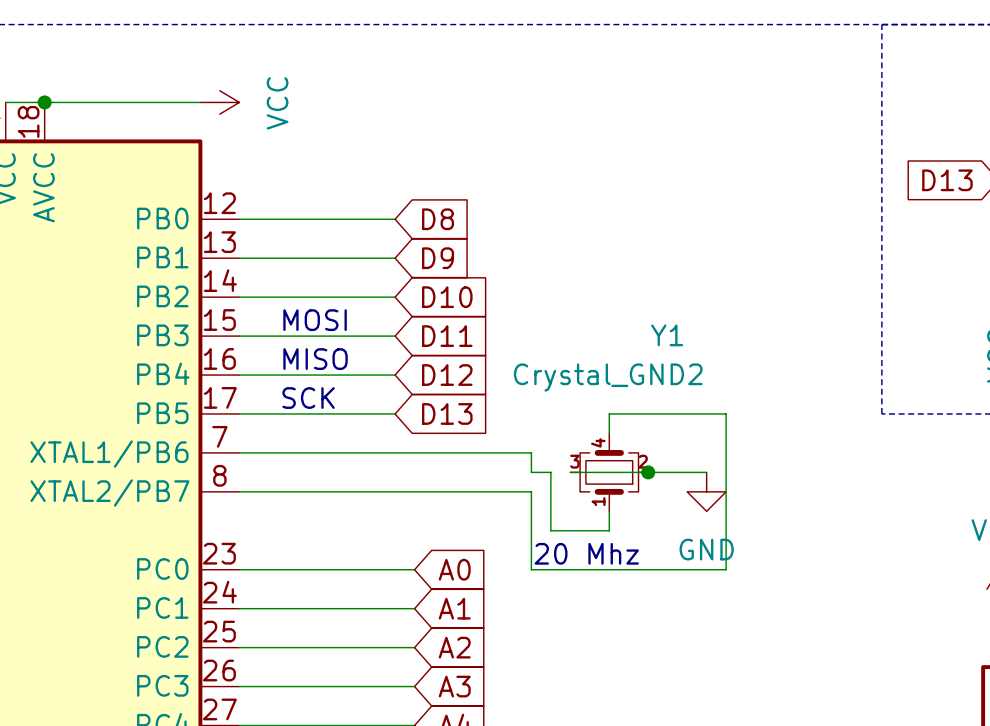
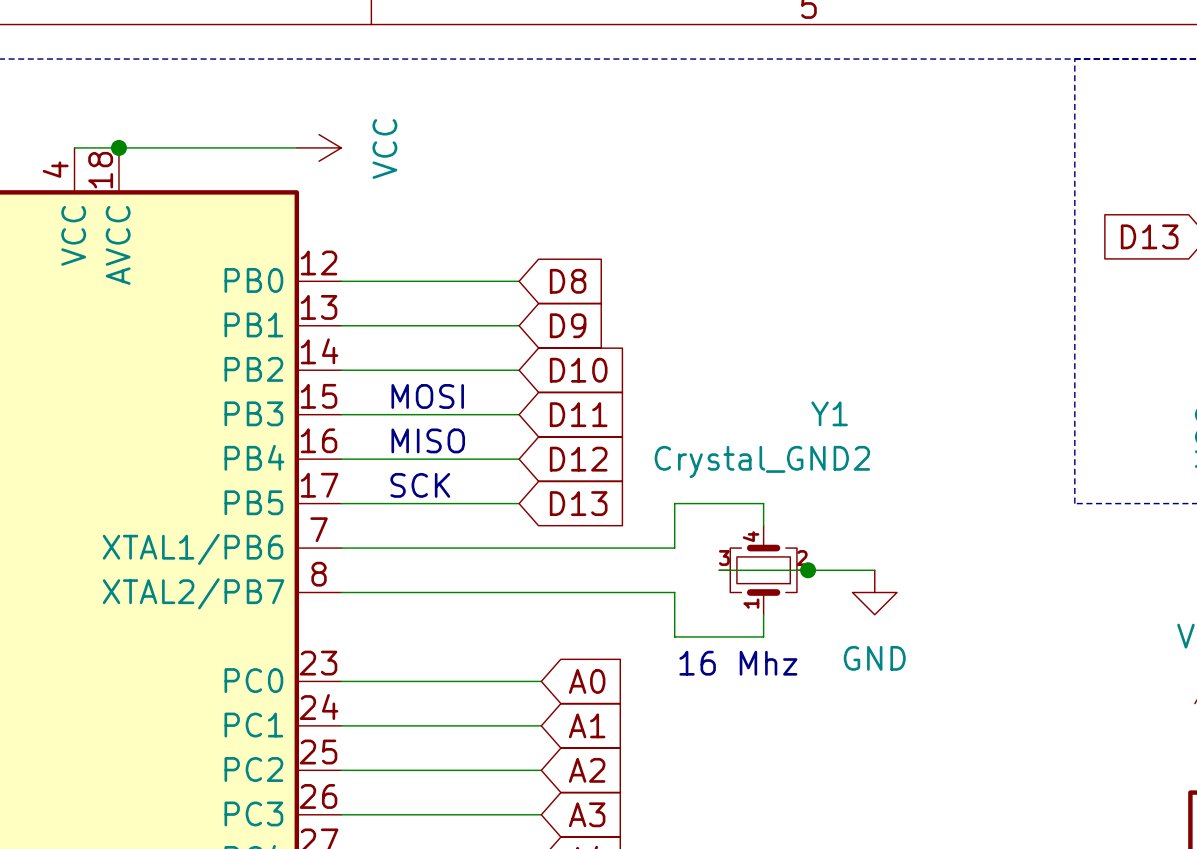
wire: (609, 413) (726, 413) (726, 569) (531, 569) (531, 530) -> (763, 503) (674, 503) (674, 548)
wire: (531, 452) (531, 472) (550, 472) (550, 530) -> (674, 636) (696, 636)
text: 20 Mhz (586, 553) -> 16 Mhz (738, 663)

